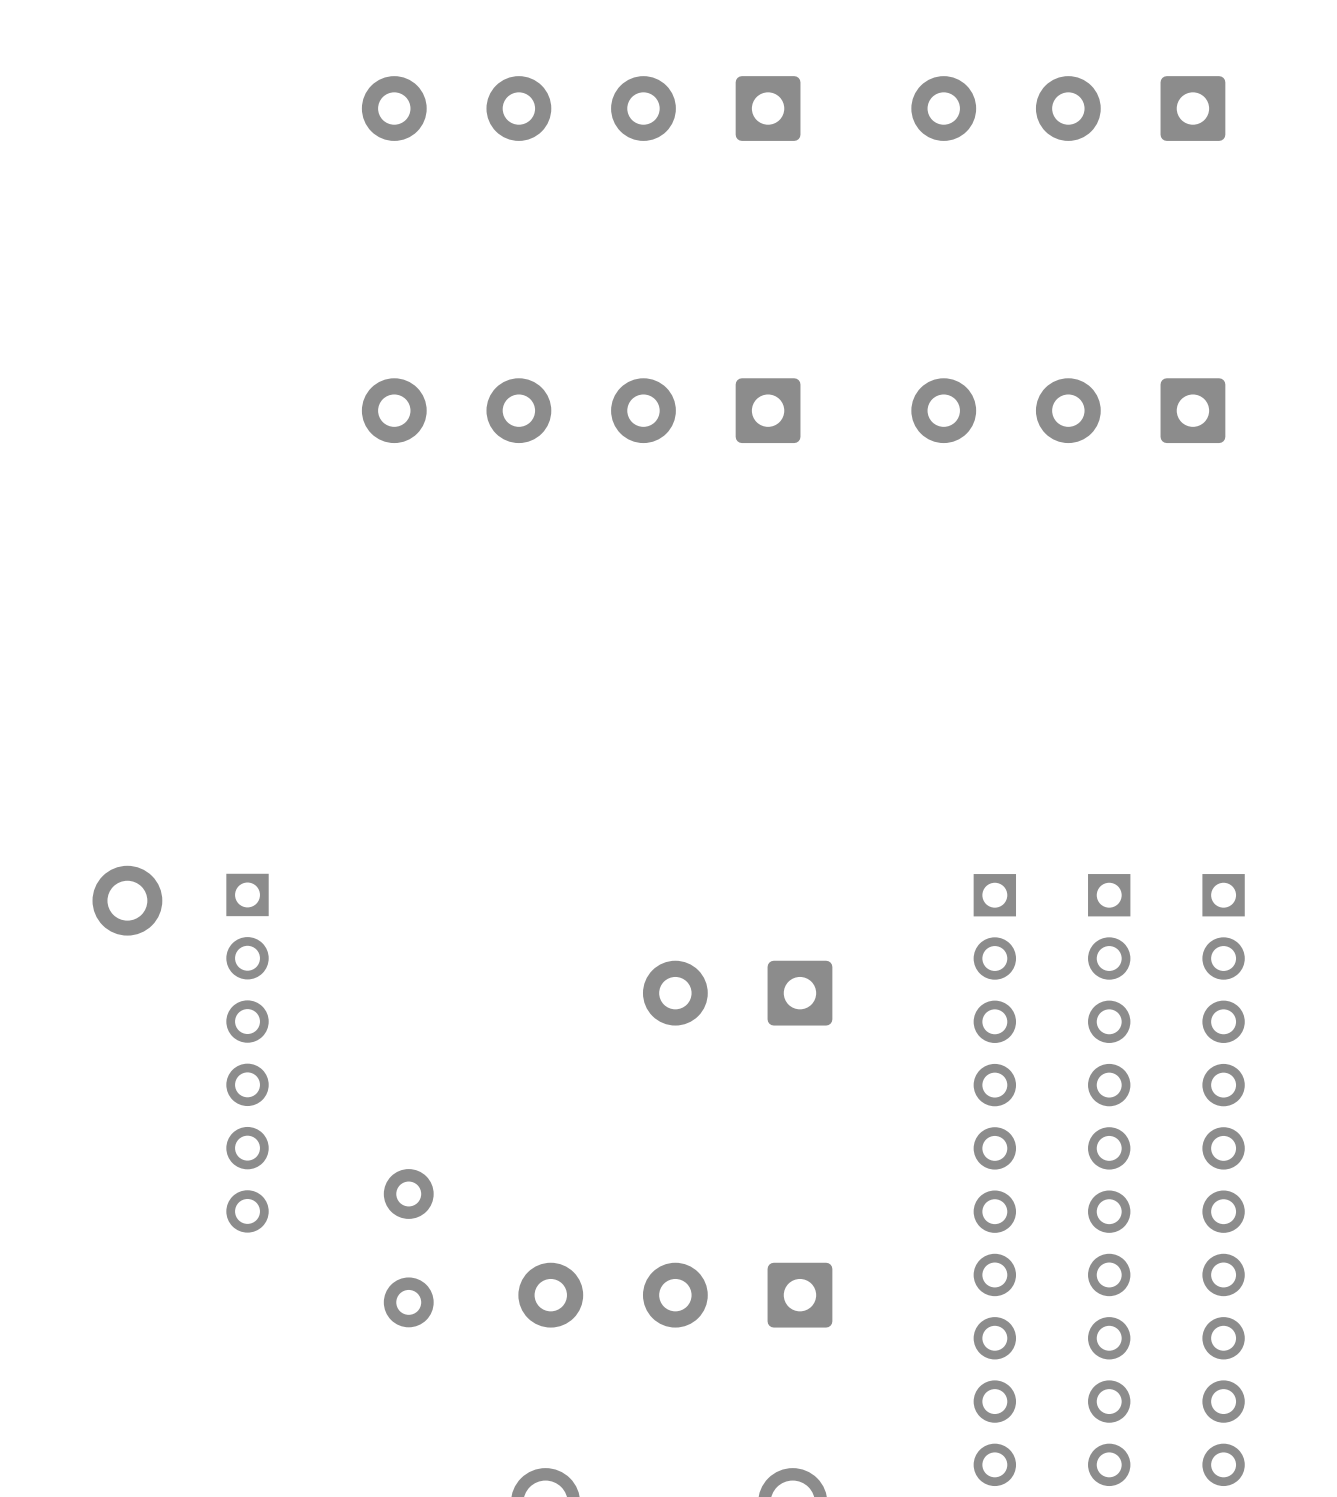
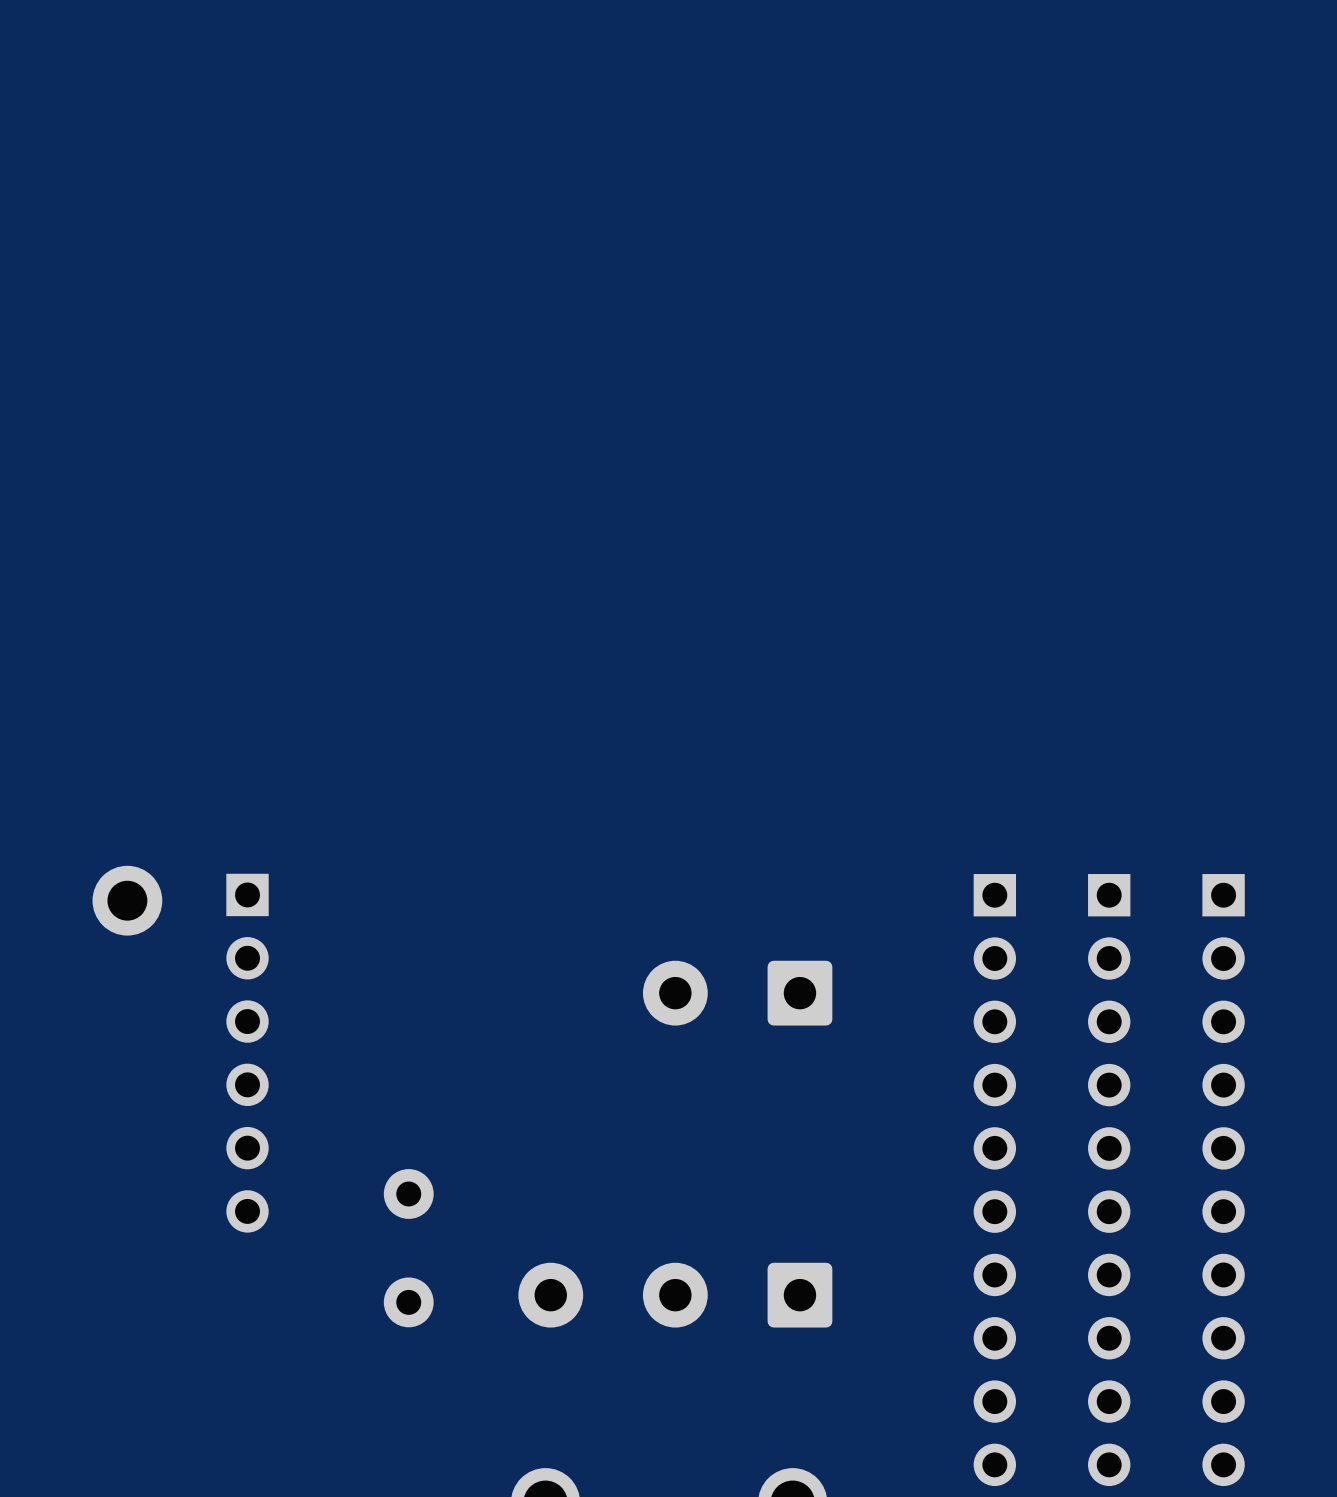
part: (581, 108) -> none
part: (1068, 108) -> none
part: (581, 410) -> none
part: (1068, 410) -> none

